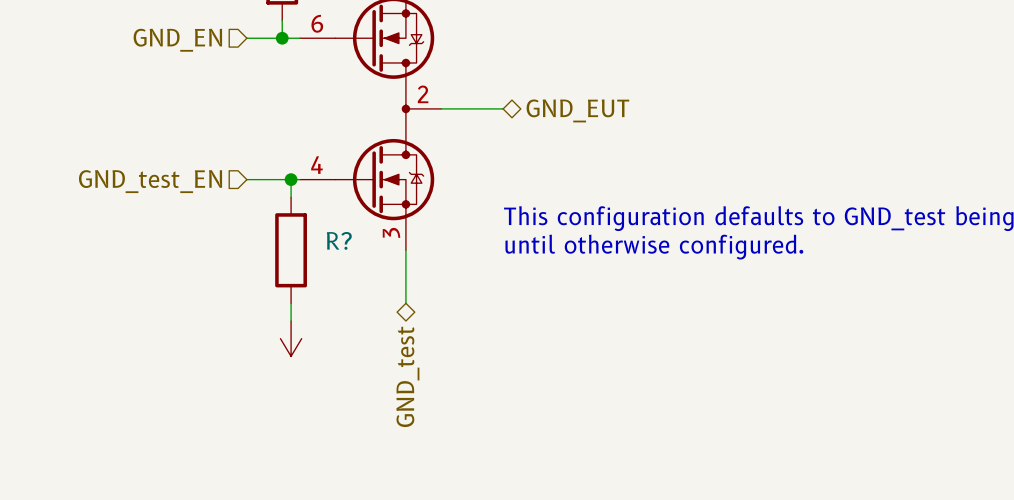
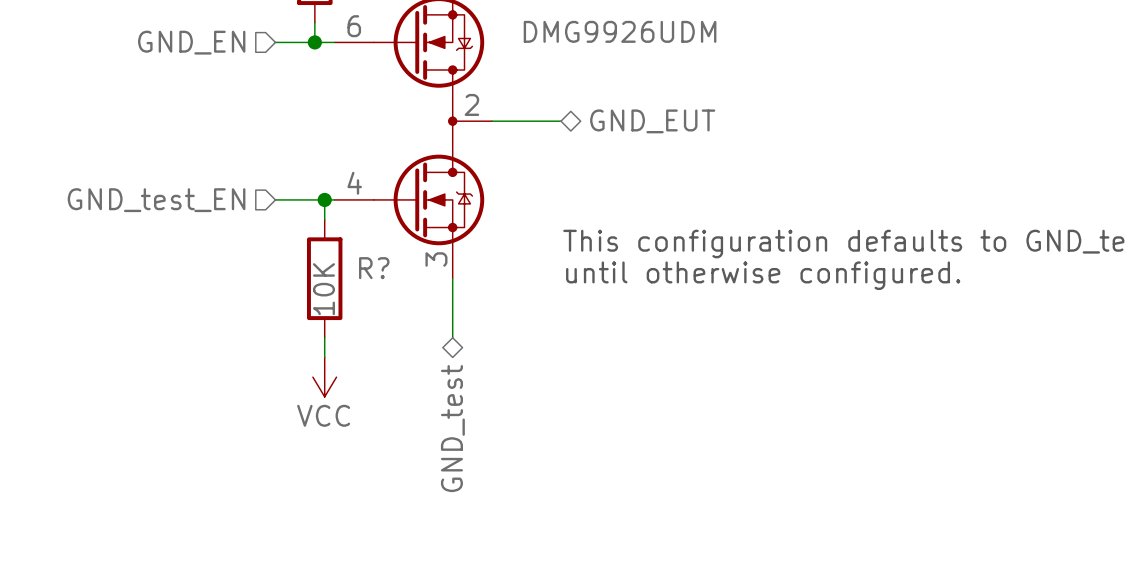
part value: none -> DMG9926UDM (620, 31)
R? value: none -> 10K (323, 289)
power symbol text: none -> VCC (323, 415)

